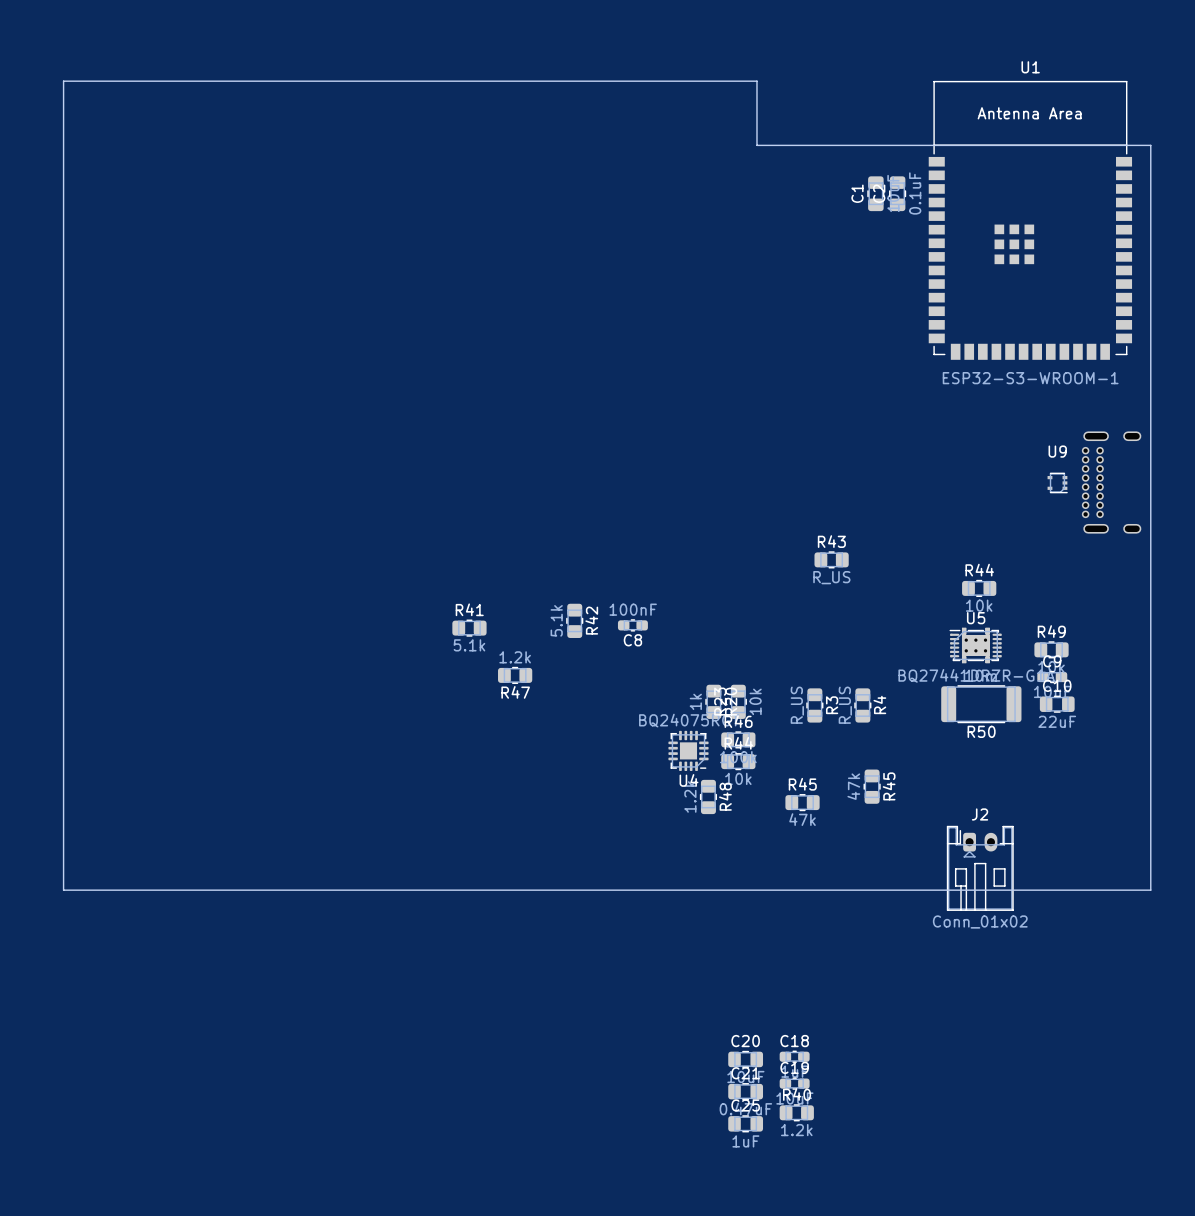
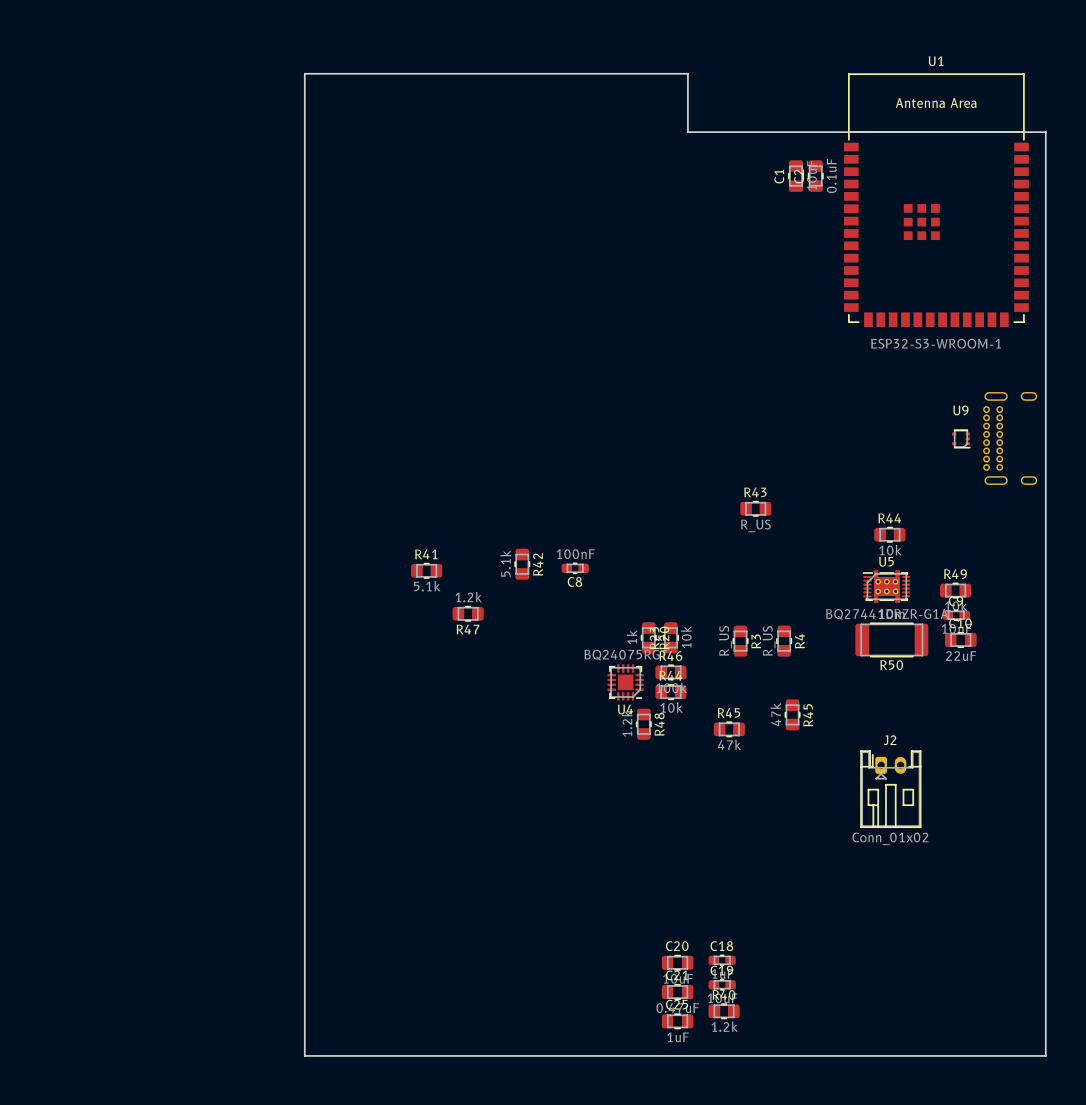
board edge: (335, 81) (63, 81) (63, 890) (1150, 890) -> (304, 73) (304, 1055) (1045, 1055) (1045, 808)

